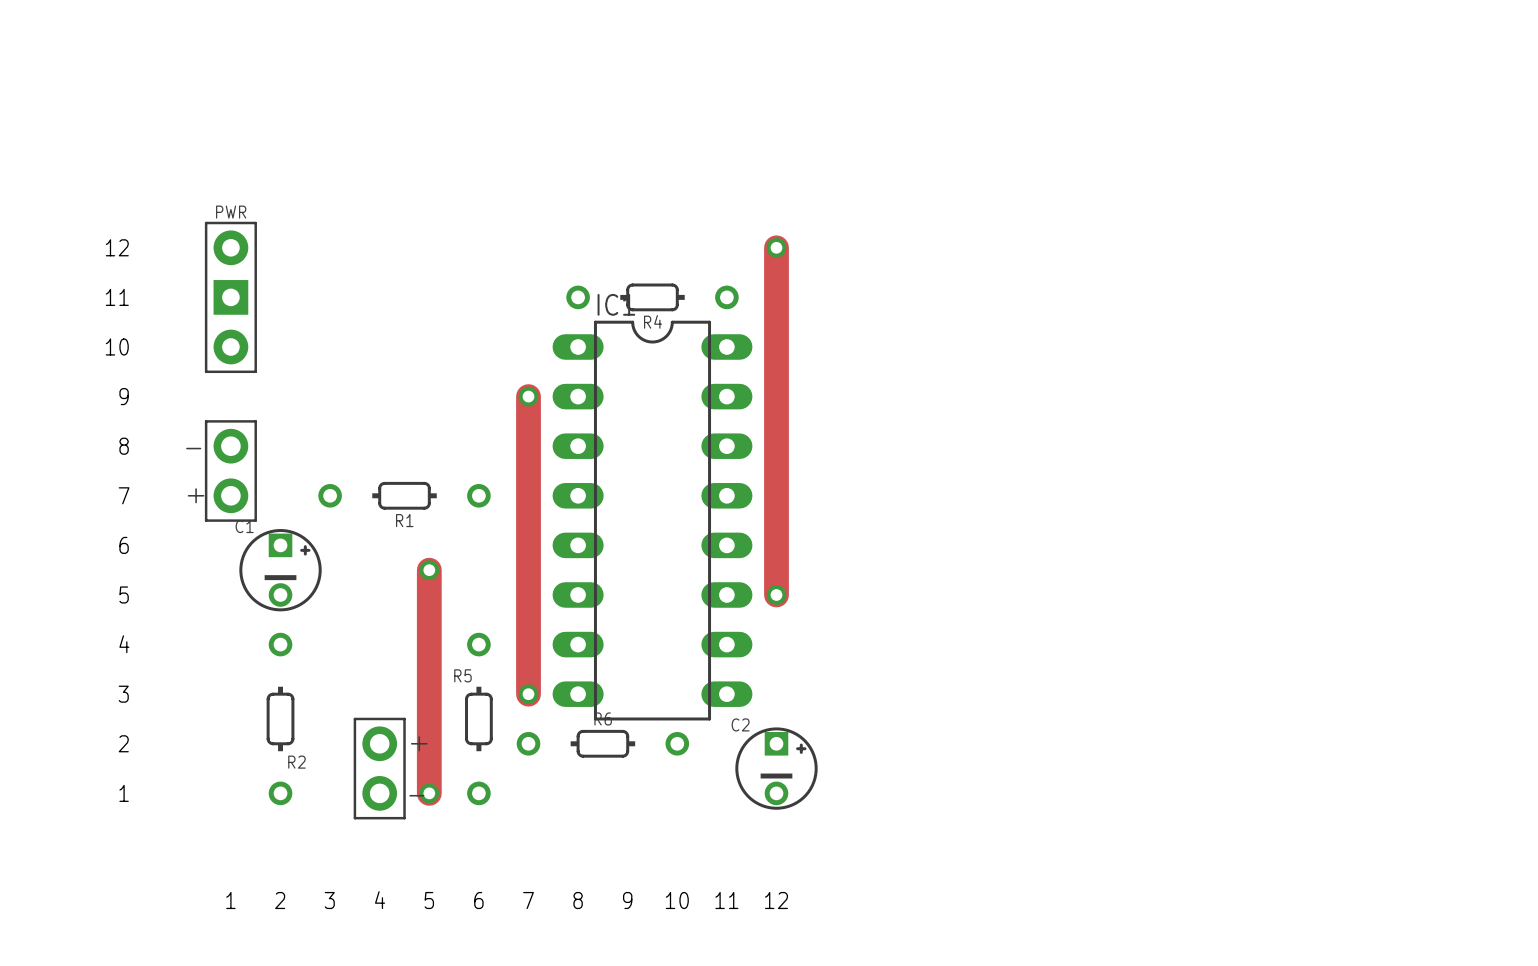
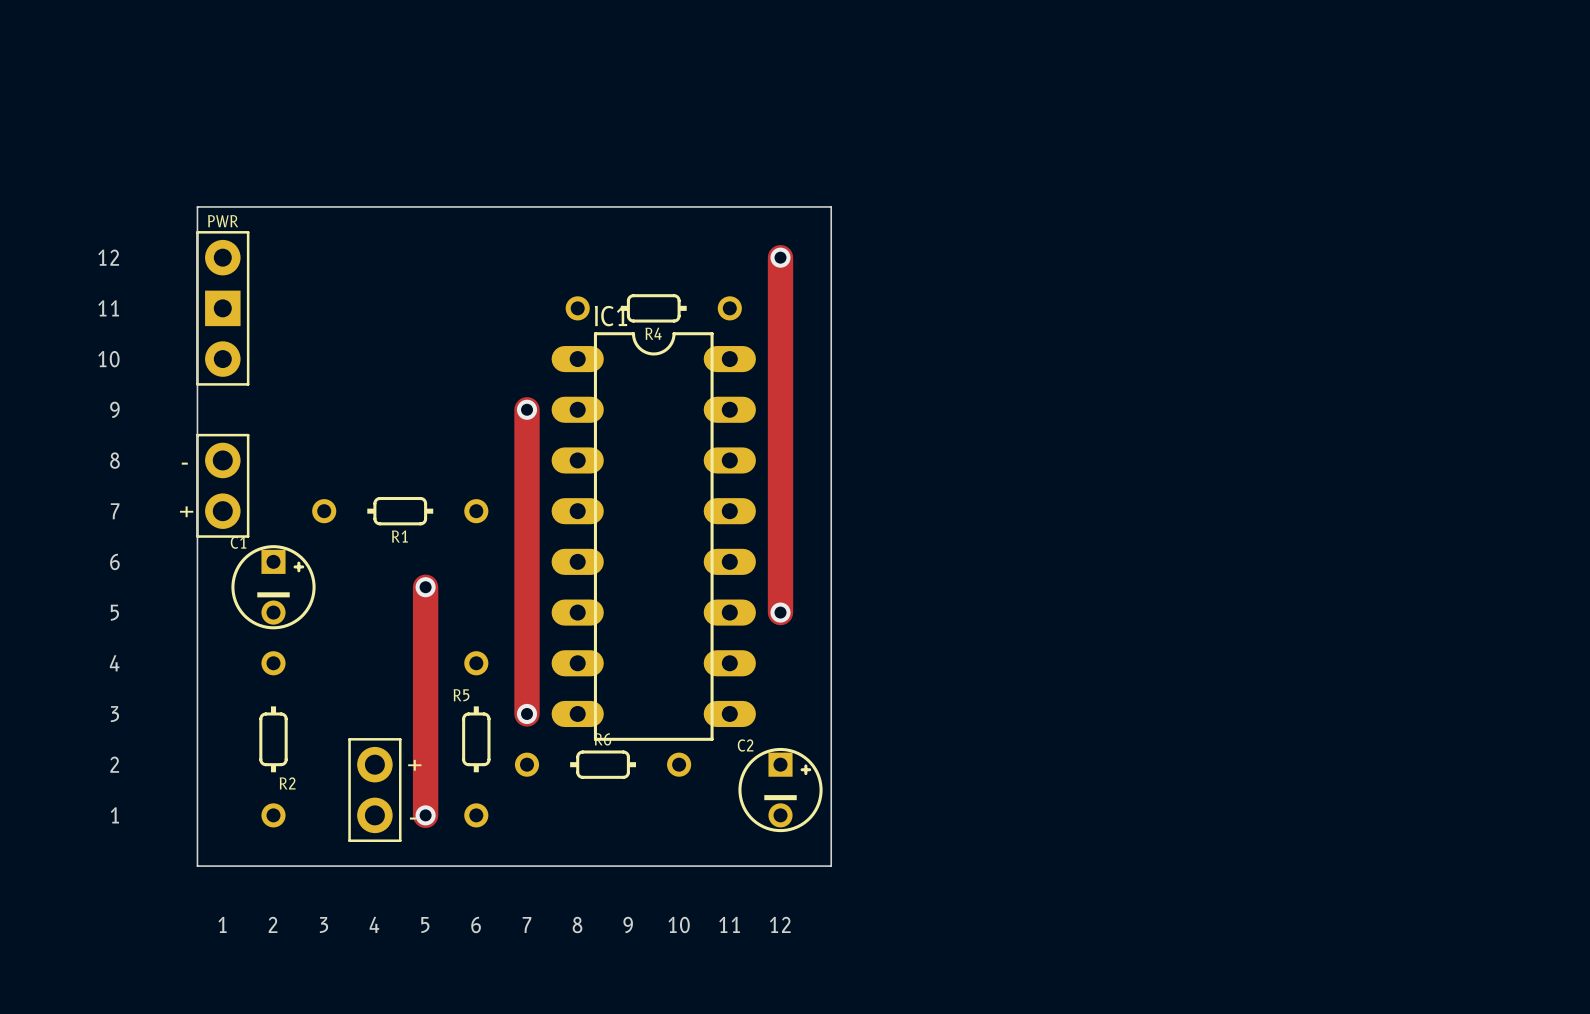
board edge: none -> (197, 206) (831, 206) (831, 866) (197, 866) (197, 206)

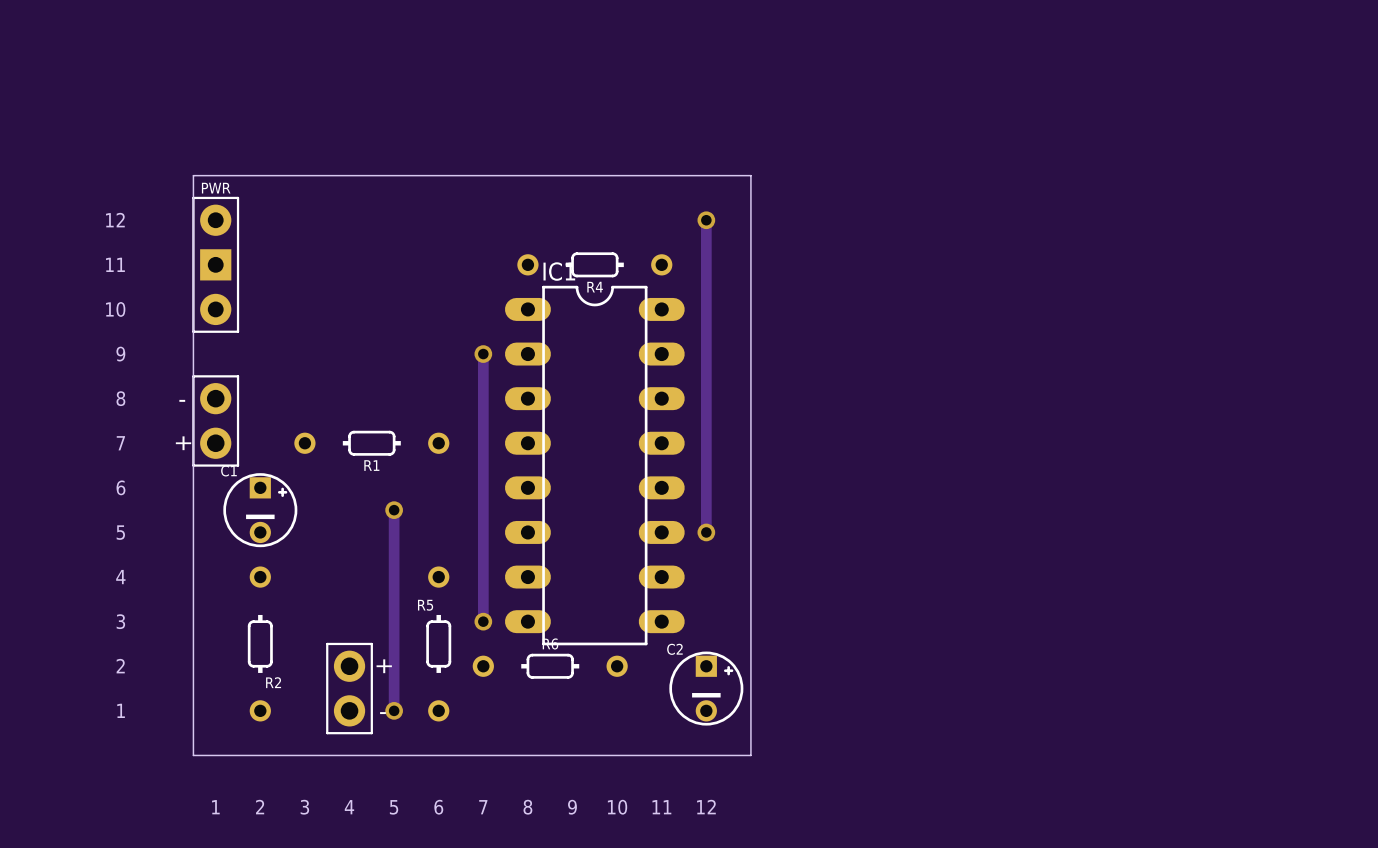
track width: thick (780, 257) (780, 612) -> thin (706, 220) (706, 532)
track width: thick (527, 409) (527, 713) -> thin (483, 354) (483, 621)
track width: thick (425, 587) (425, 815) -> thin (394, 510) (394, 710)

